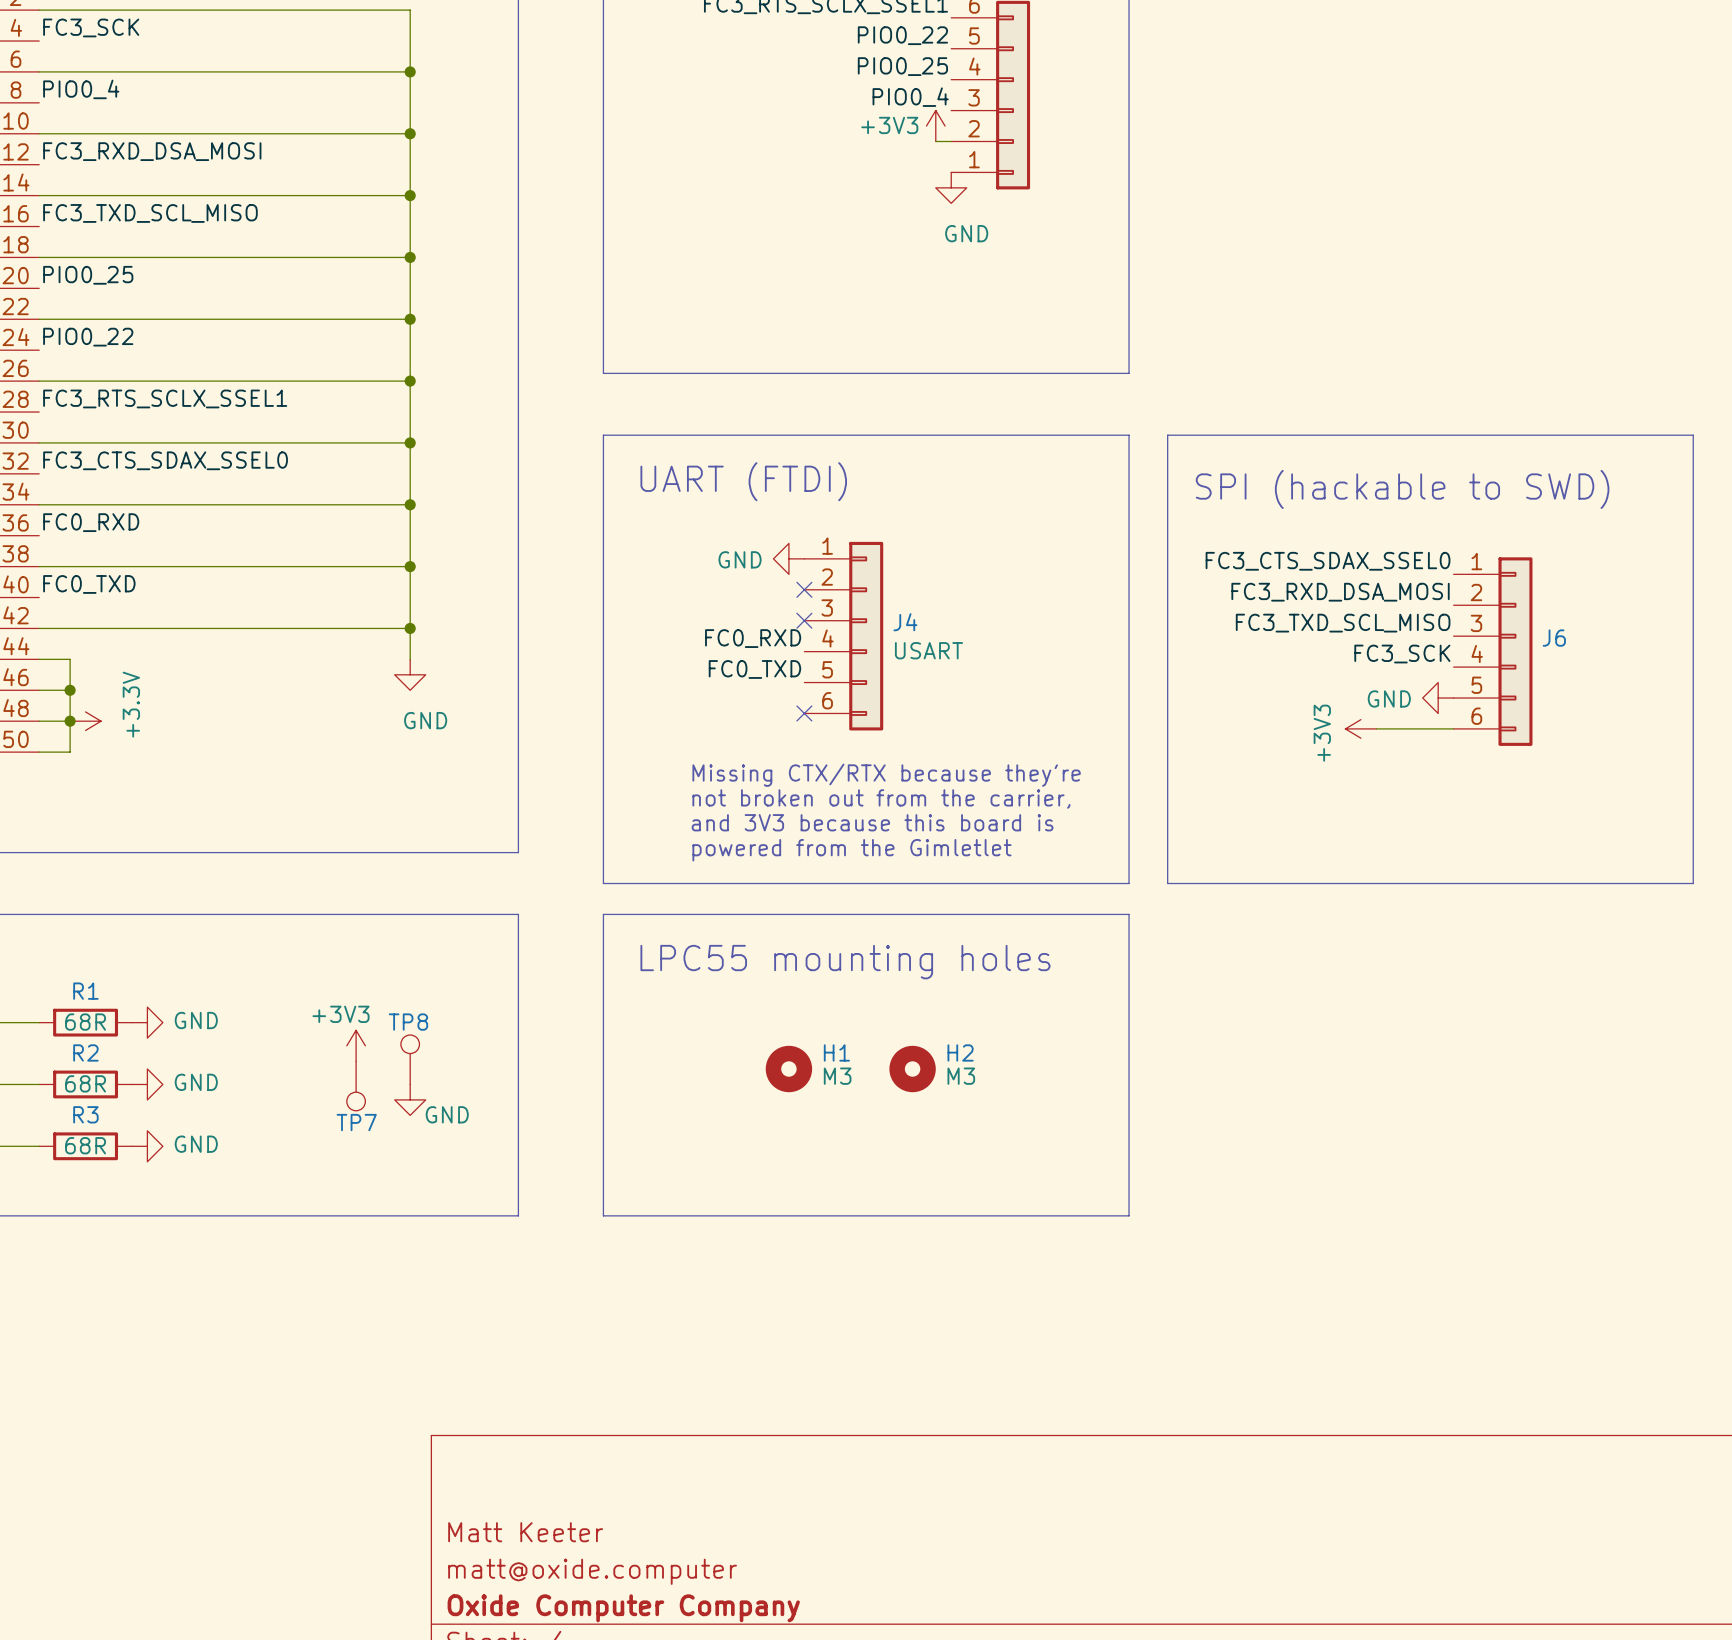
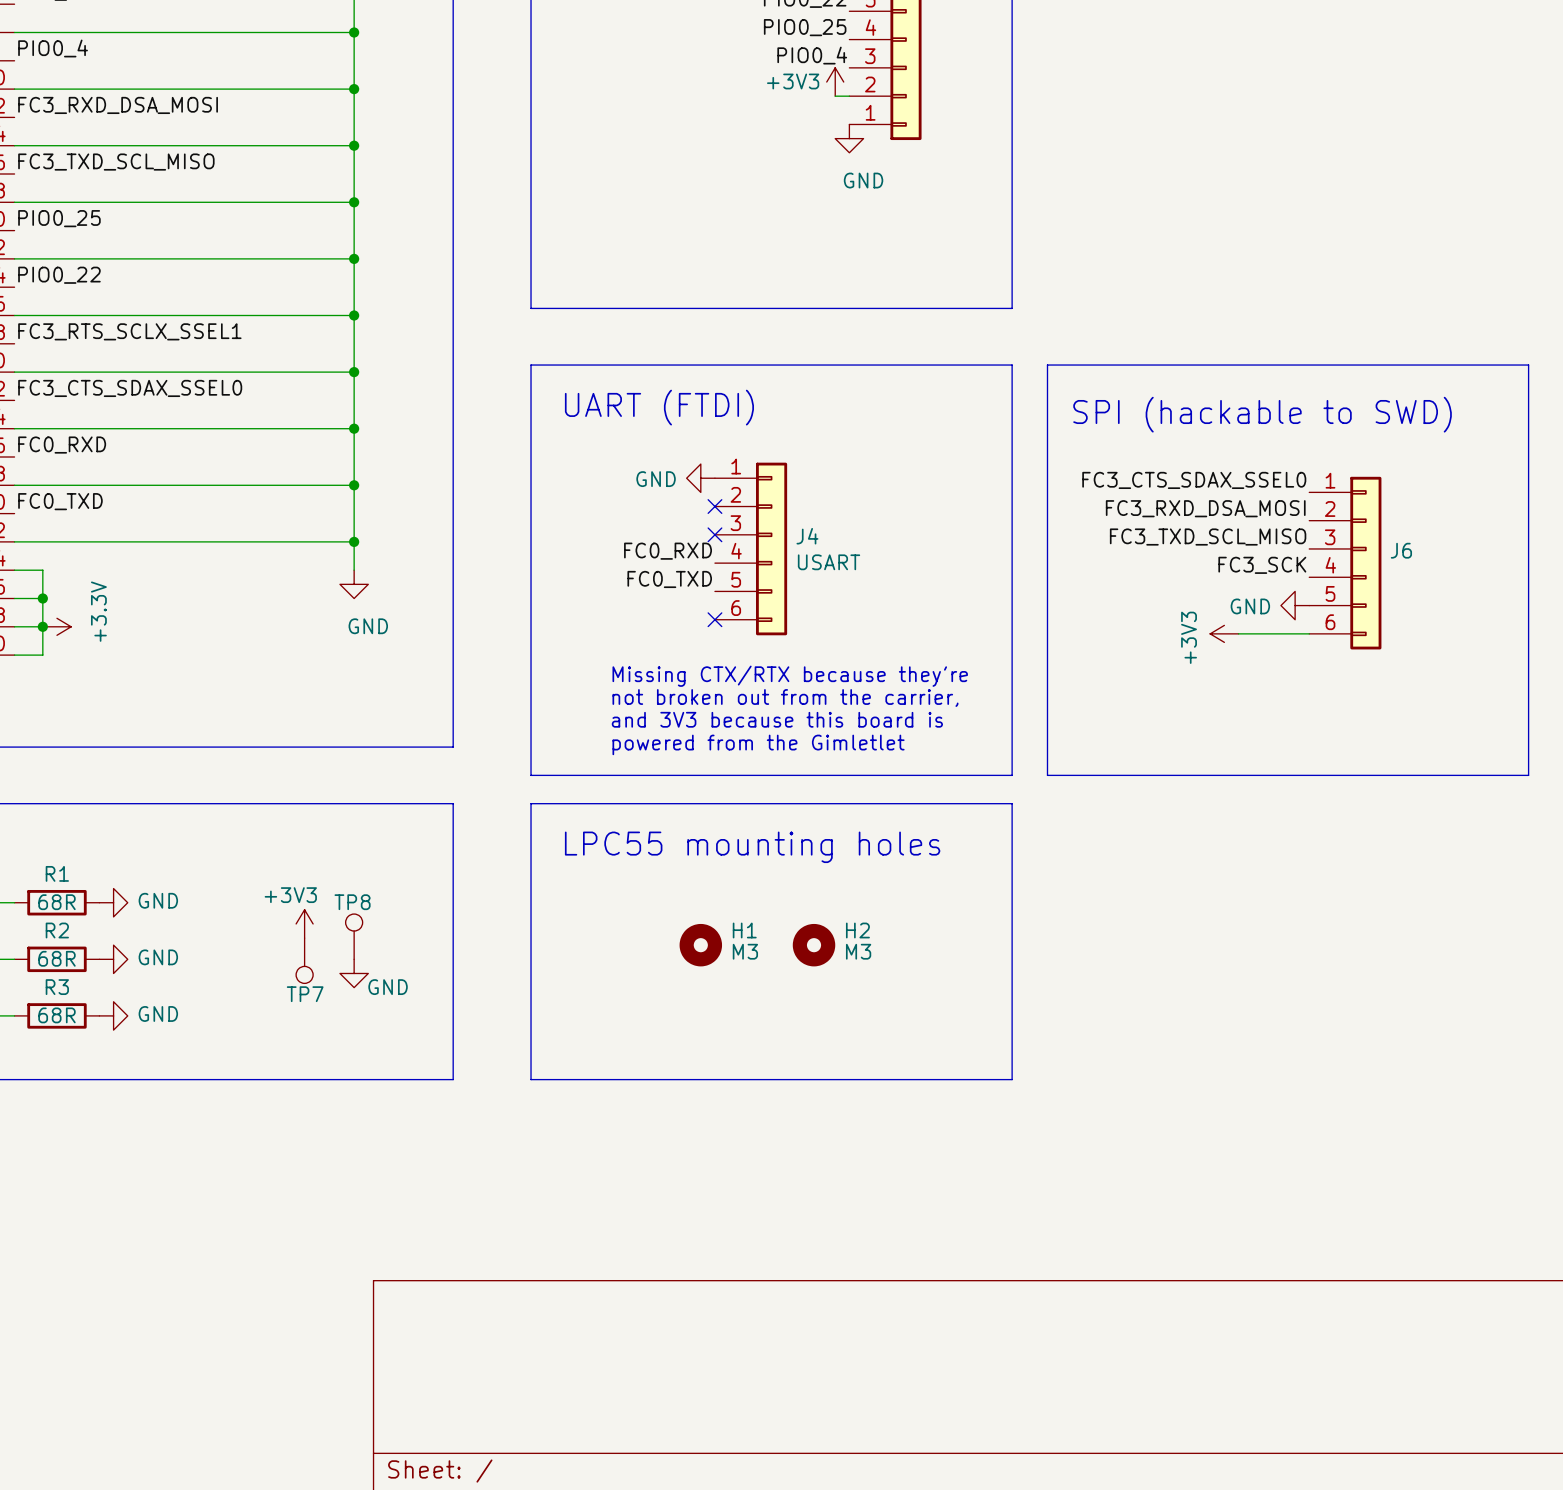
title block: Matt Keeter (525, 1532) -> none
title block: matt@oxide.computer (592, 1571) -> none
title block: Oxide Computer Company (623, 1608) -> none

